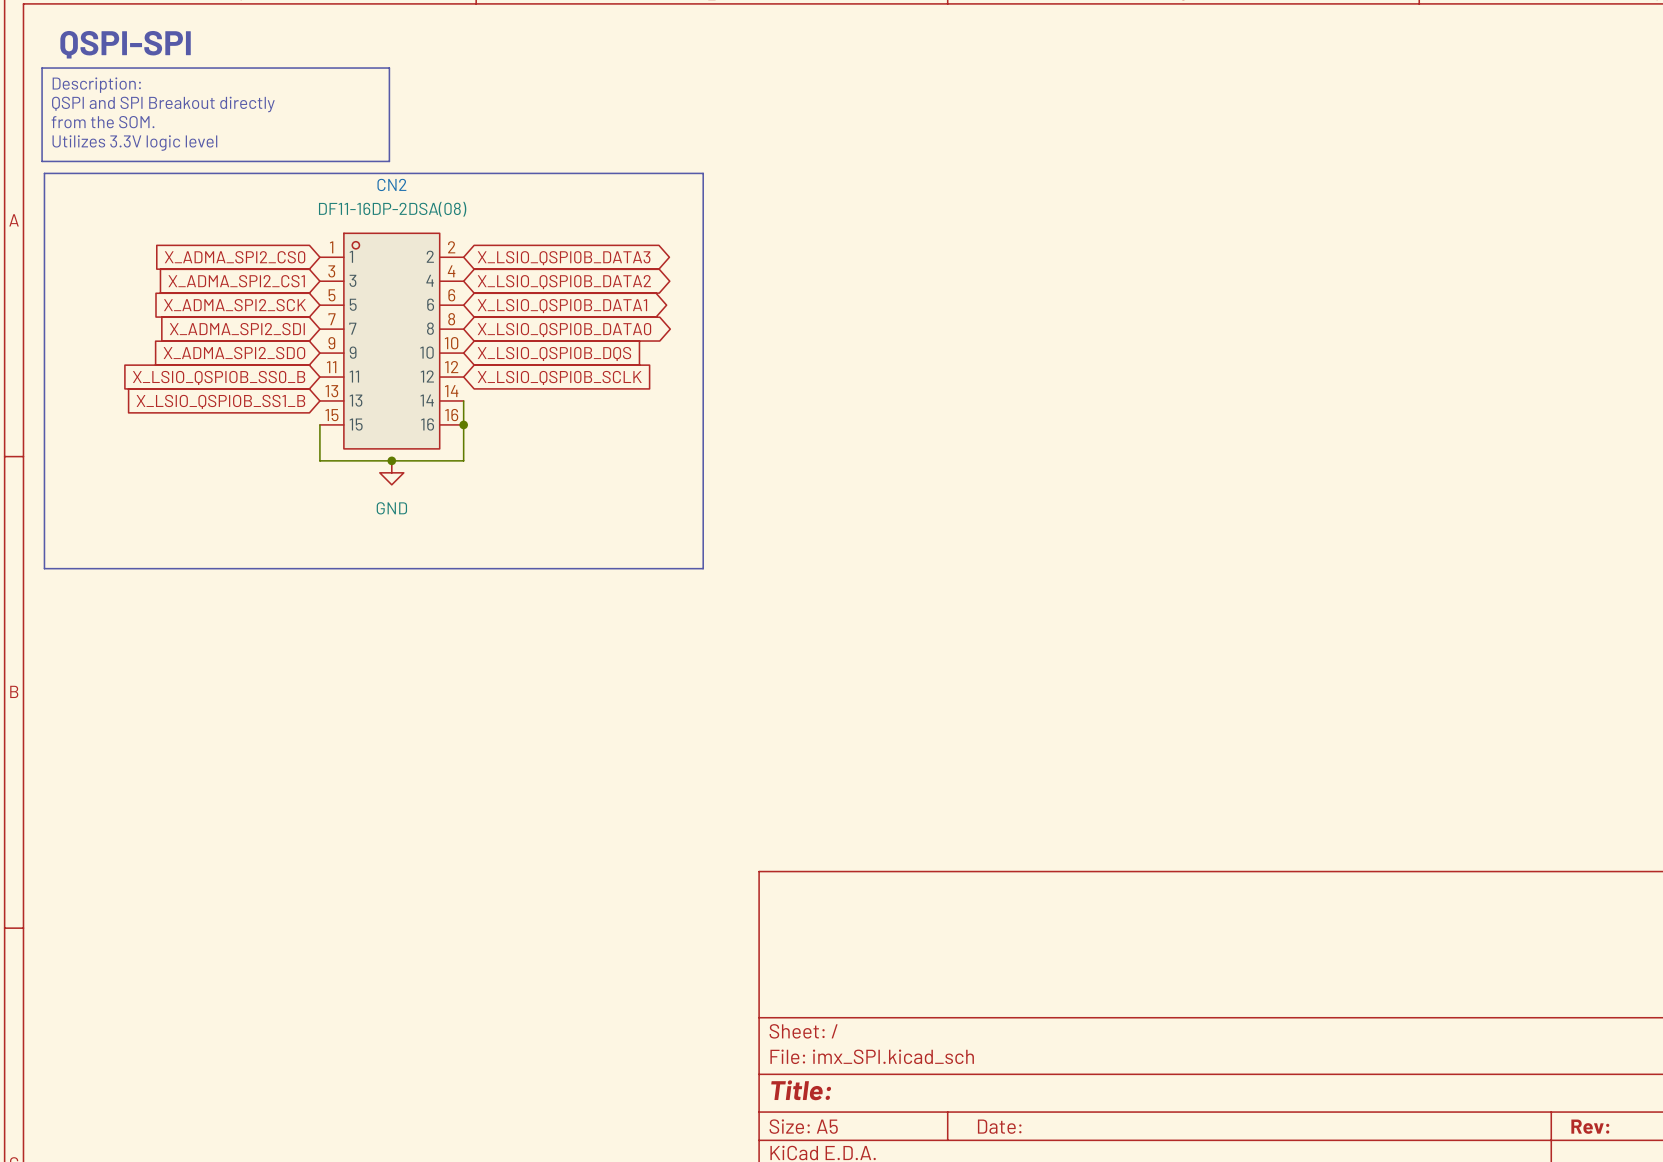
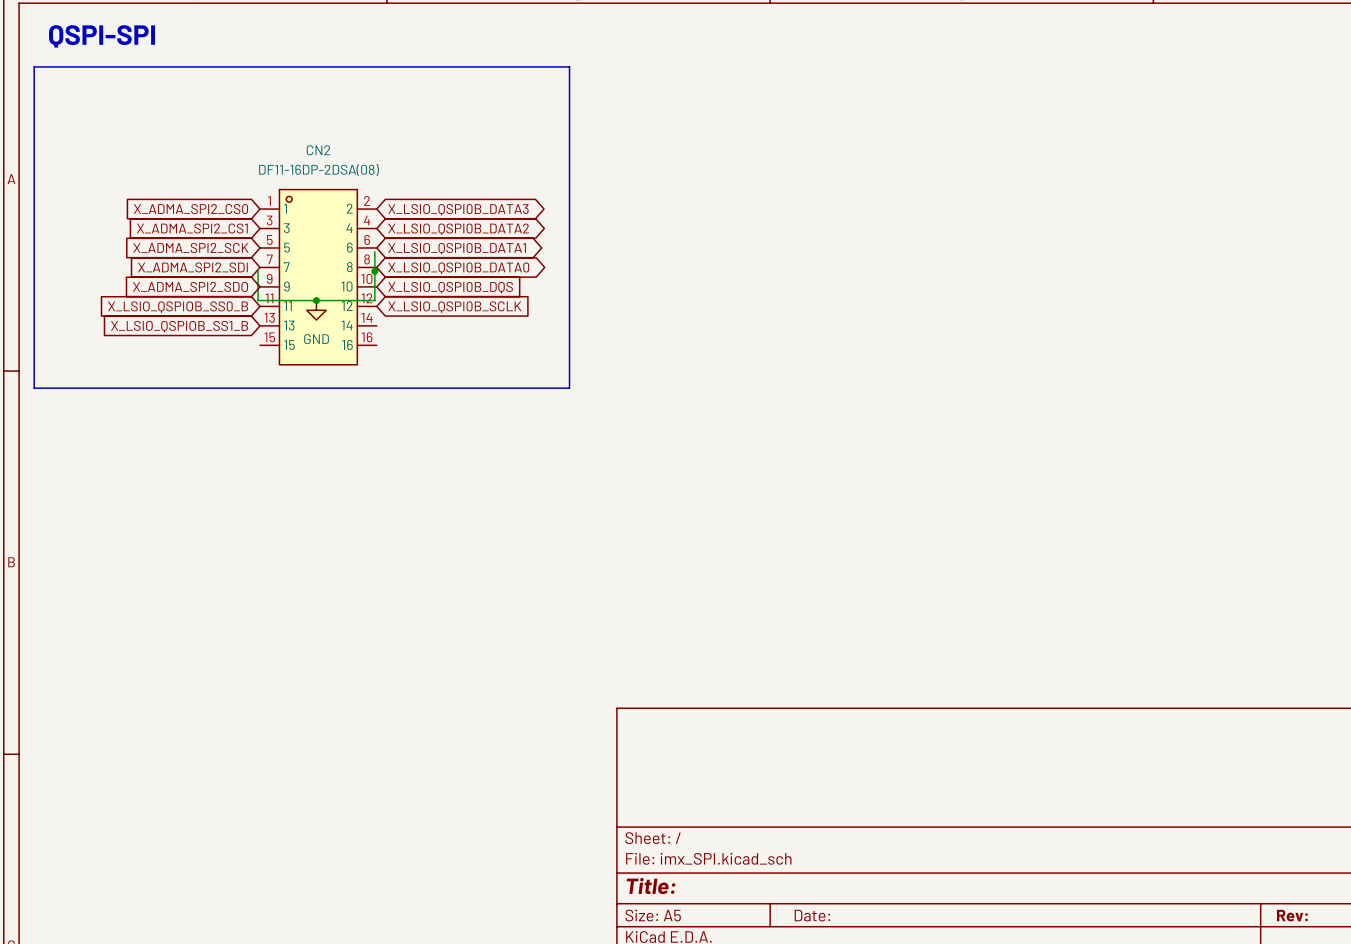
line: (42, 82) (42, 68) (389, 68) (389, 161) (42, 161) -> (34, 66) (569, 66) (569, 388) (34, 388) (34, 131)
text: Description: (96, 85) -> none
text: QSPI and SPI Breakout directly (163, 104) -> none
text: from the SOM. (103, 122) -> none
text: Utilizes 3.3V logic level (134, 143) -> none
line: (44, 173) (703, 173) (703, 568) (44, 568) (44, 173) -> none
junction: none -> (374, 271)
junction: none -> (316, 300)
wire: (463, 400) (463, 460) (319, 460) (319, 424) -> (374, 251) (374, 300) (258, 300) (258, 271)
junction: (463, 424) -> none
junction: (391, 460) -> none
power symbol position: GND (391, 472) -> GND (316, 310)

